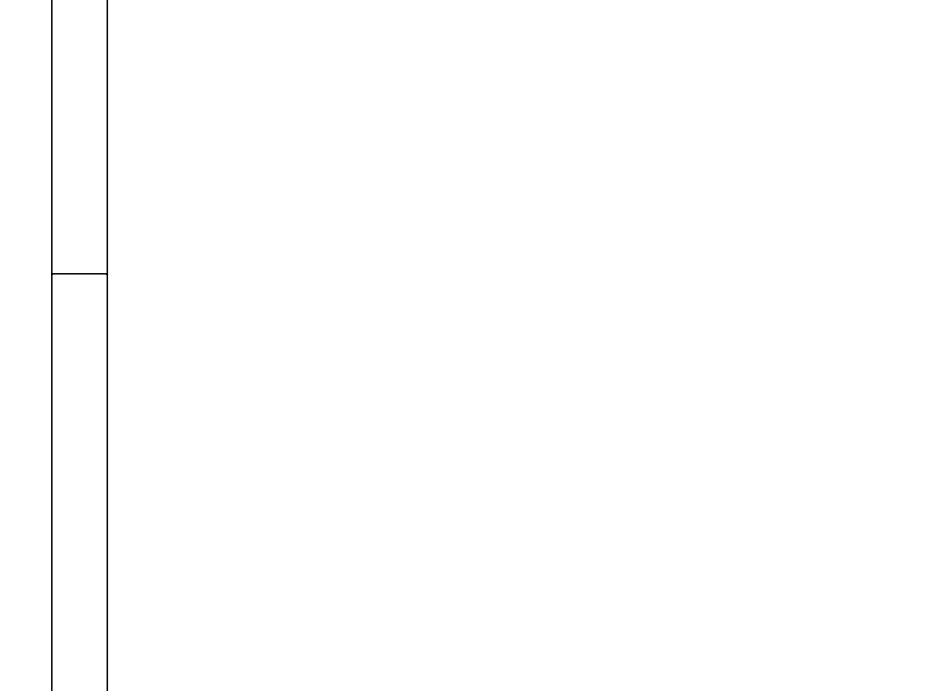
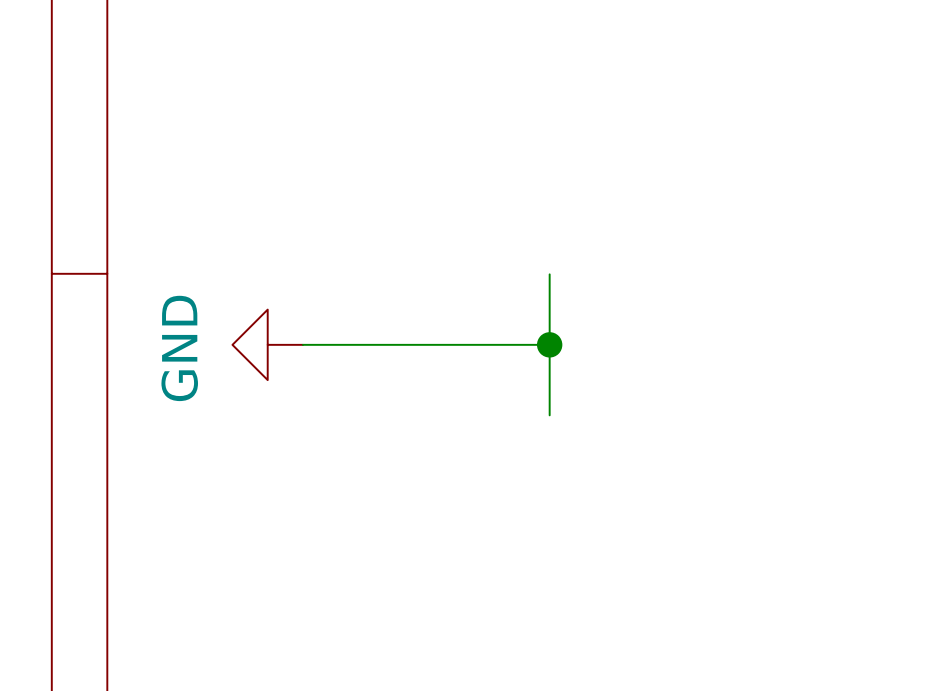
wire: none -> (549, 274) (549, 415)
power symbol: none -> GND (267, 344)
wire: none -> (302, 344) (549, 344)
junction: none -> (549, 344)

